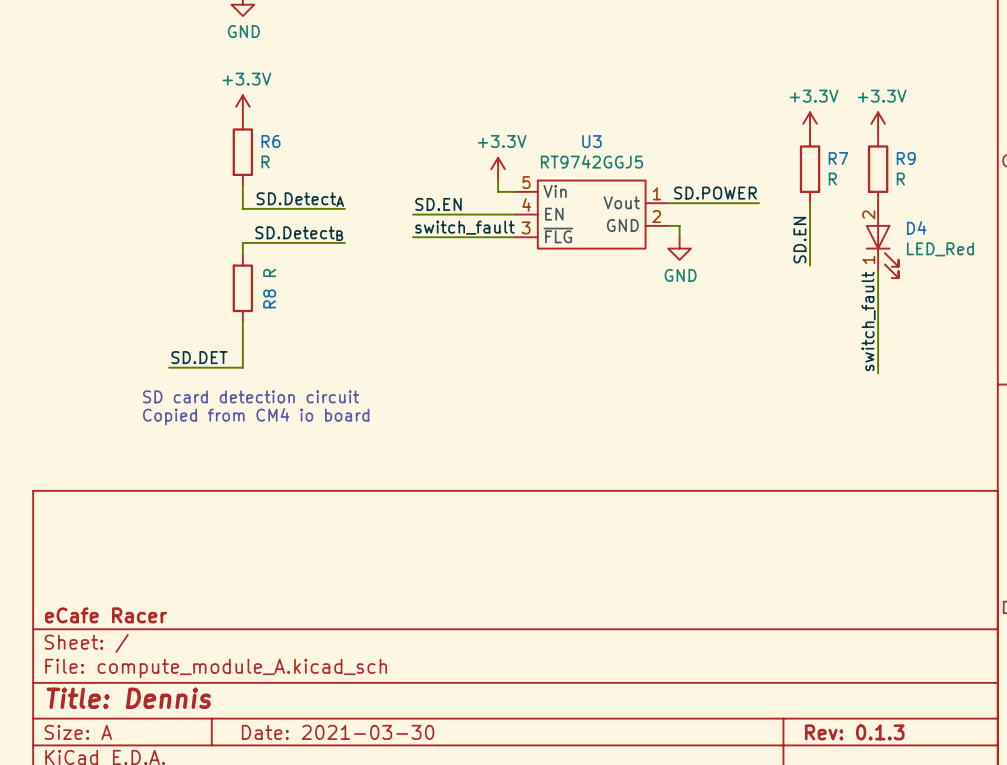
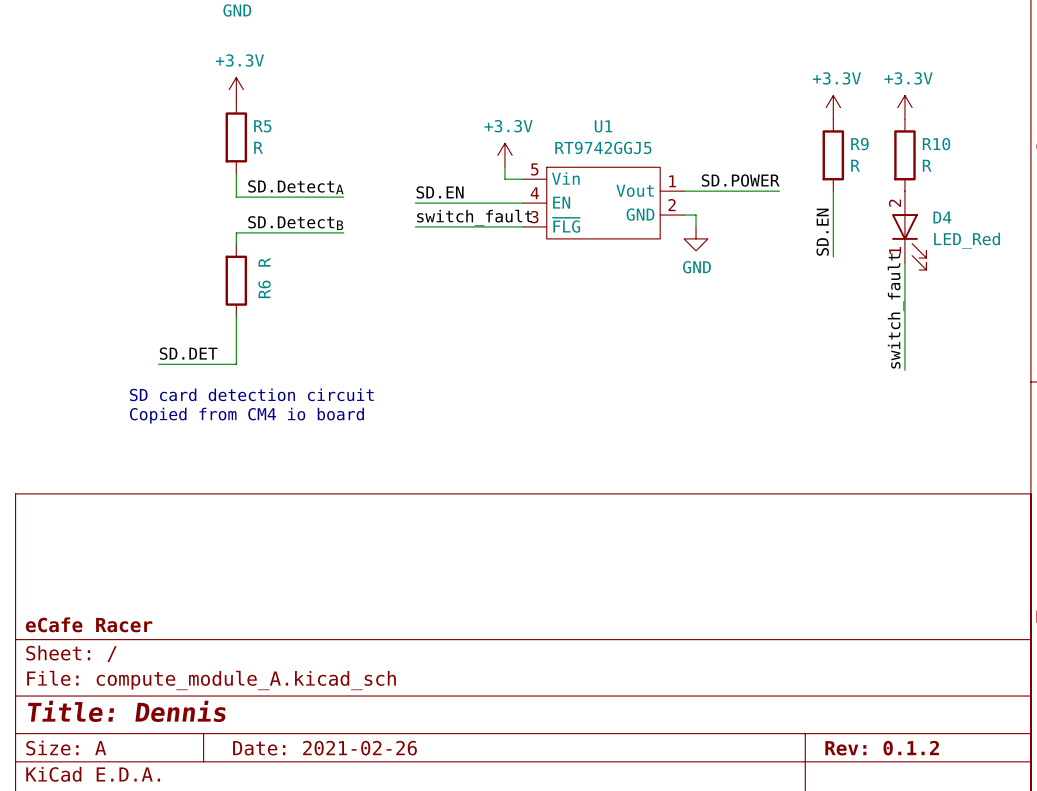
R6 name: R6 (270, 141) -> R5 (262, 126)
U3 name: U3 (591, 141) -> U1 (603, 126)
R7 name: R7 (838, 158) -> R9 (859, 144)
R9 name: R9 (906, 158) -> R10 (936, 144)
R8 name: R8 (269, 298) -> R6 (264, 289)
title block: Date: 2021-03-30 (338, 732) -> Date: 2021-02-26 (324, 748)
title block: Rev: 0.1.3 (854, 732) -> Rev: 0.1.2 (882, 748)

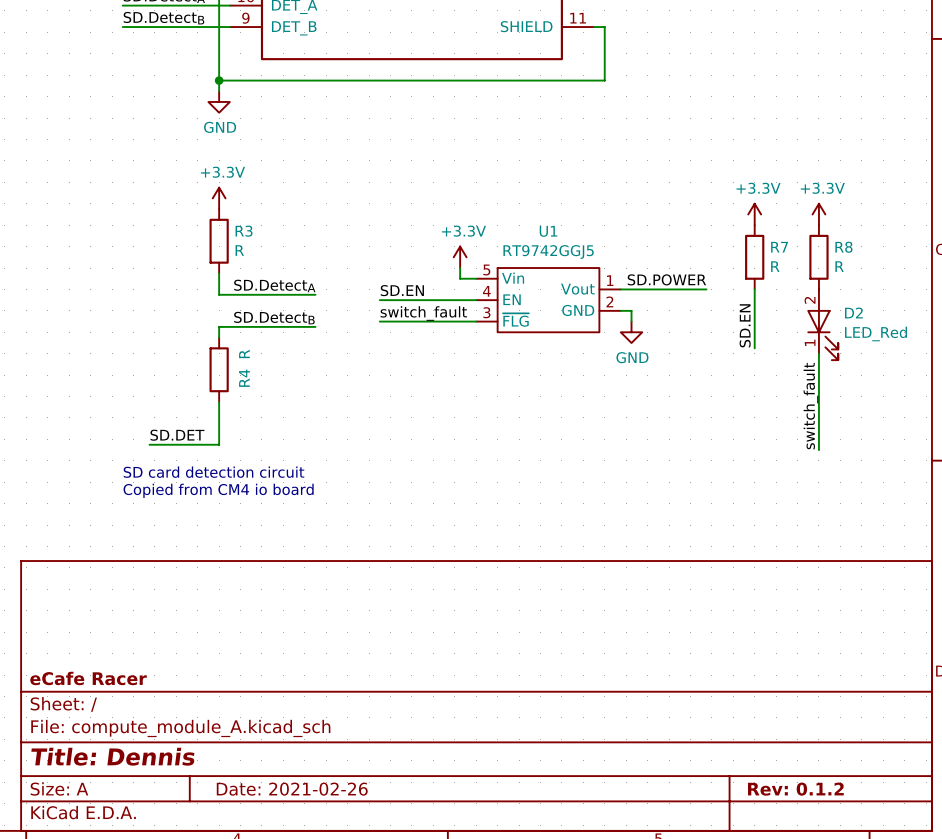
R5 name: R5 (262, 126) -> R3 (244, 231)
R9 name: R9 (859, 144) -> R7 (779, 247)
R10 name: R10 (936, 144) -> R8 (843, 247)
D4 name: D4 (942, 217) -> D2 (853, 312)
R6 name: R6 (264, 289) -> R4 (244, 378)

